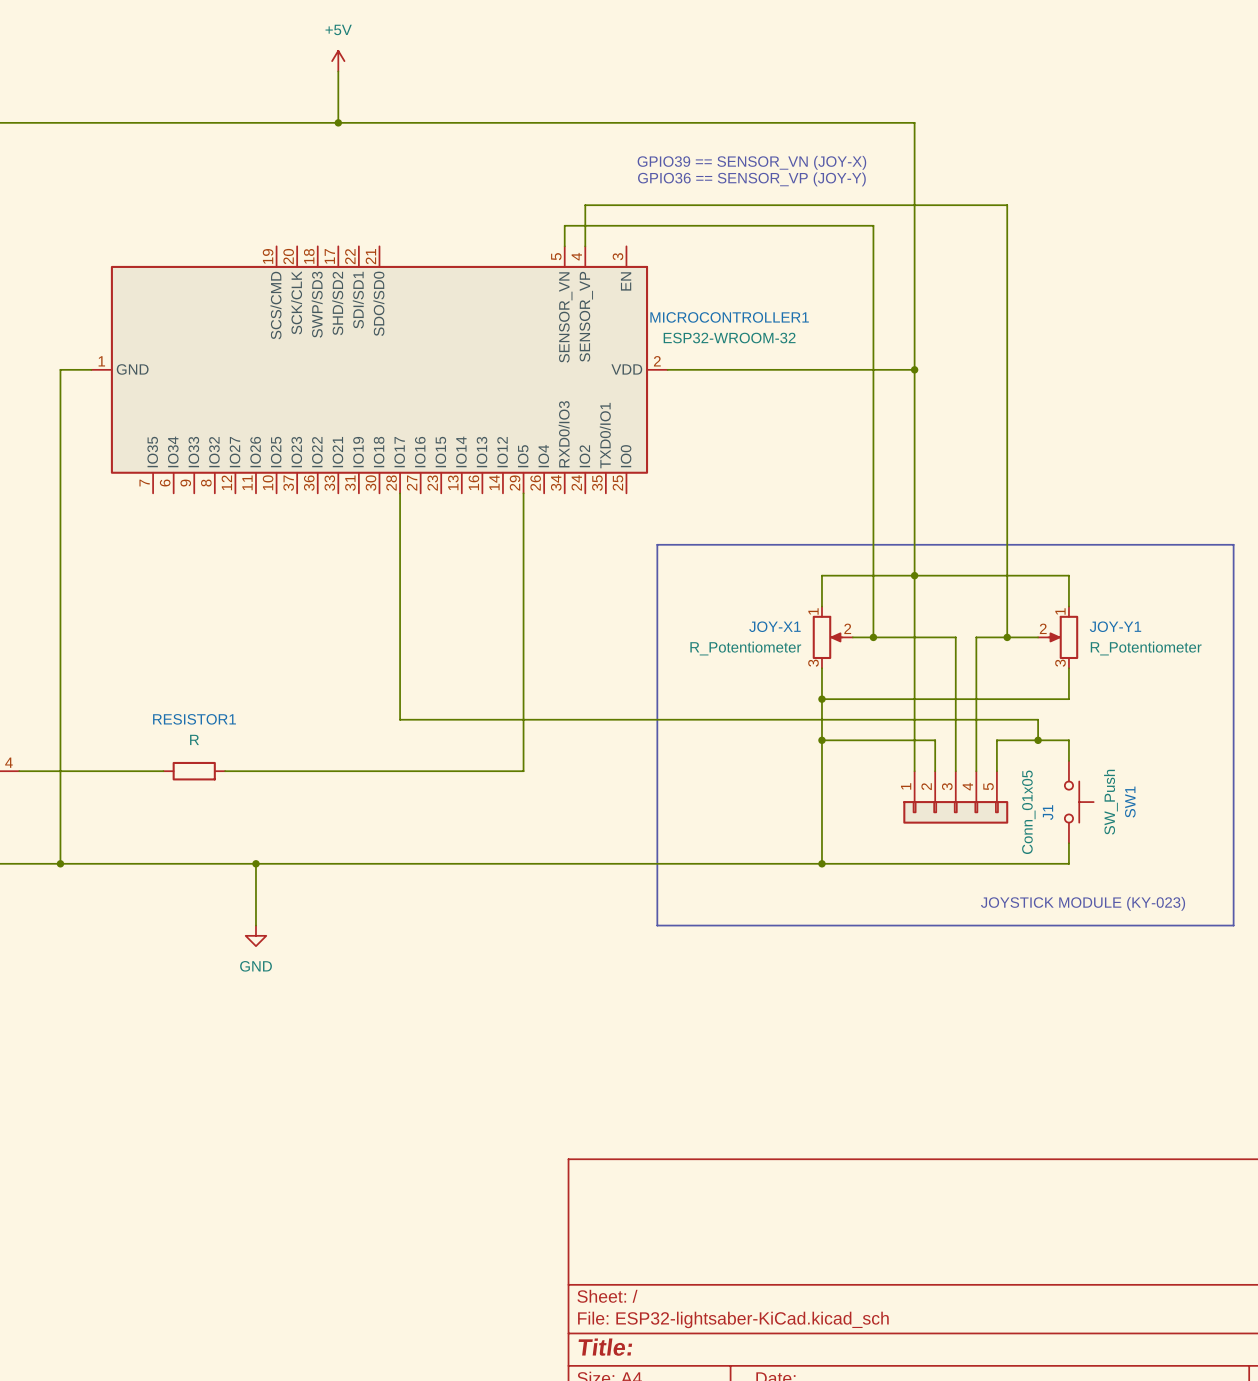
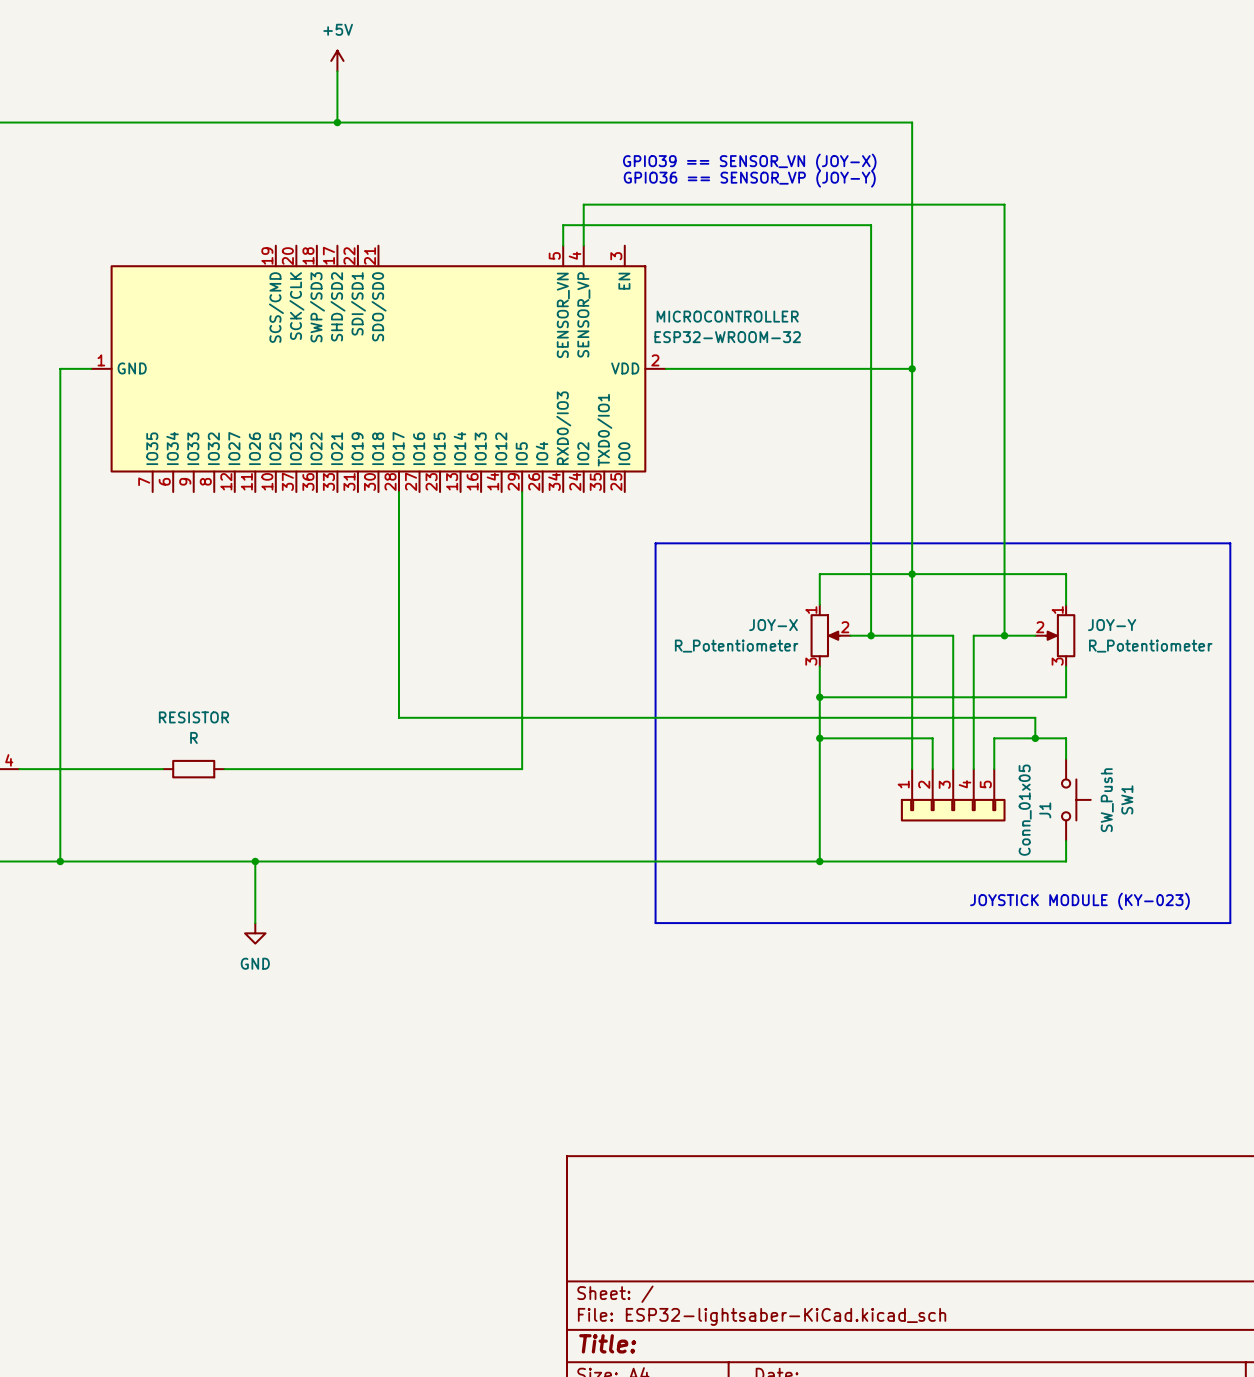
MICROCONTROLLER1 name: MICROCONTROLLER1 (729, 317) -> MICROCONTROLLER (727, 316)
JOY-X1 name: JOY-X1 (774, 626) -> JOY-X (773, 625)
JOY-Y1 name: JOY-Y1 (1115, 626) -> JOY-Y (1112, 625)
RESISTOR1 name: RESISTOR1 (194, 719) -> RESISTOR (193, 717)

